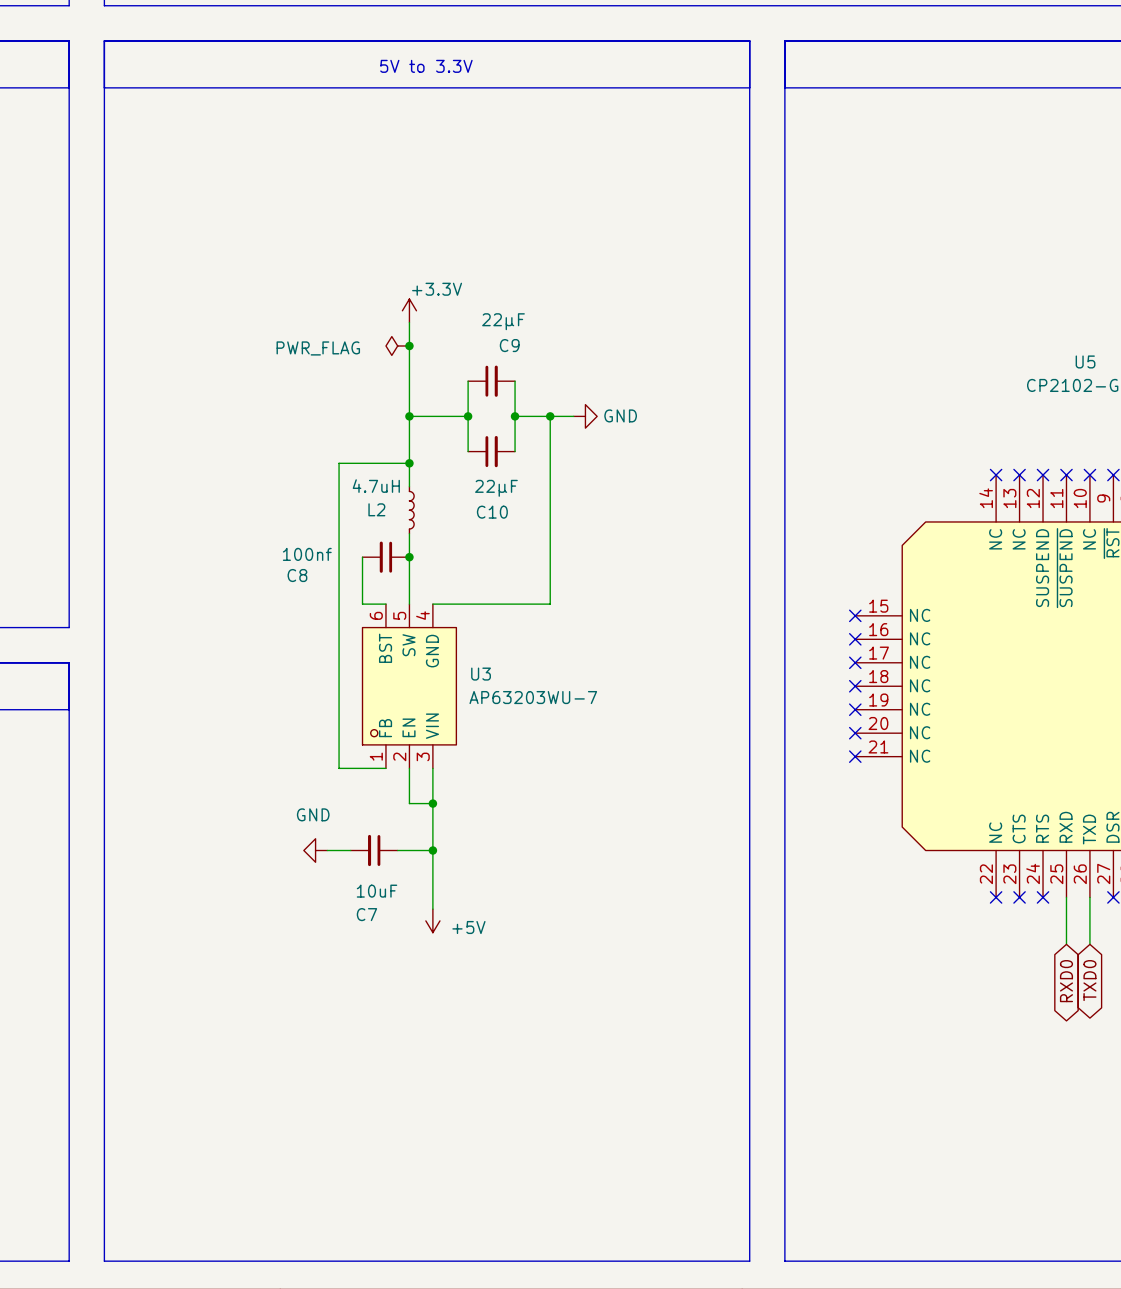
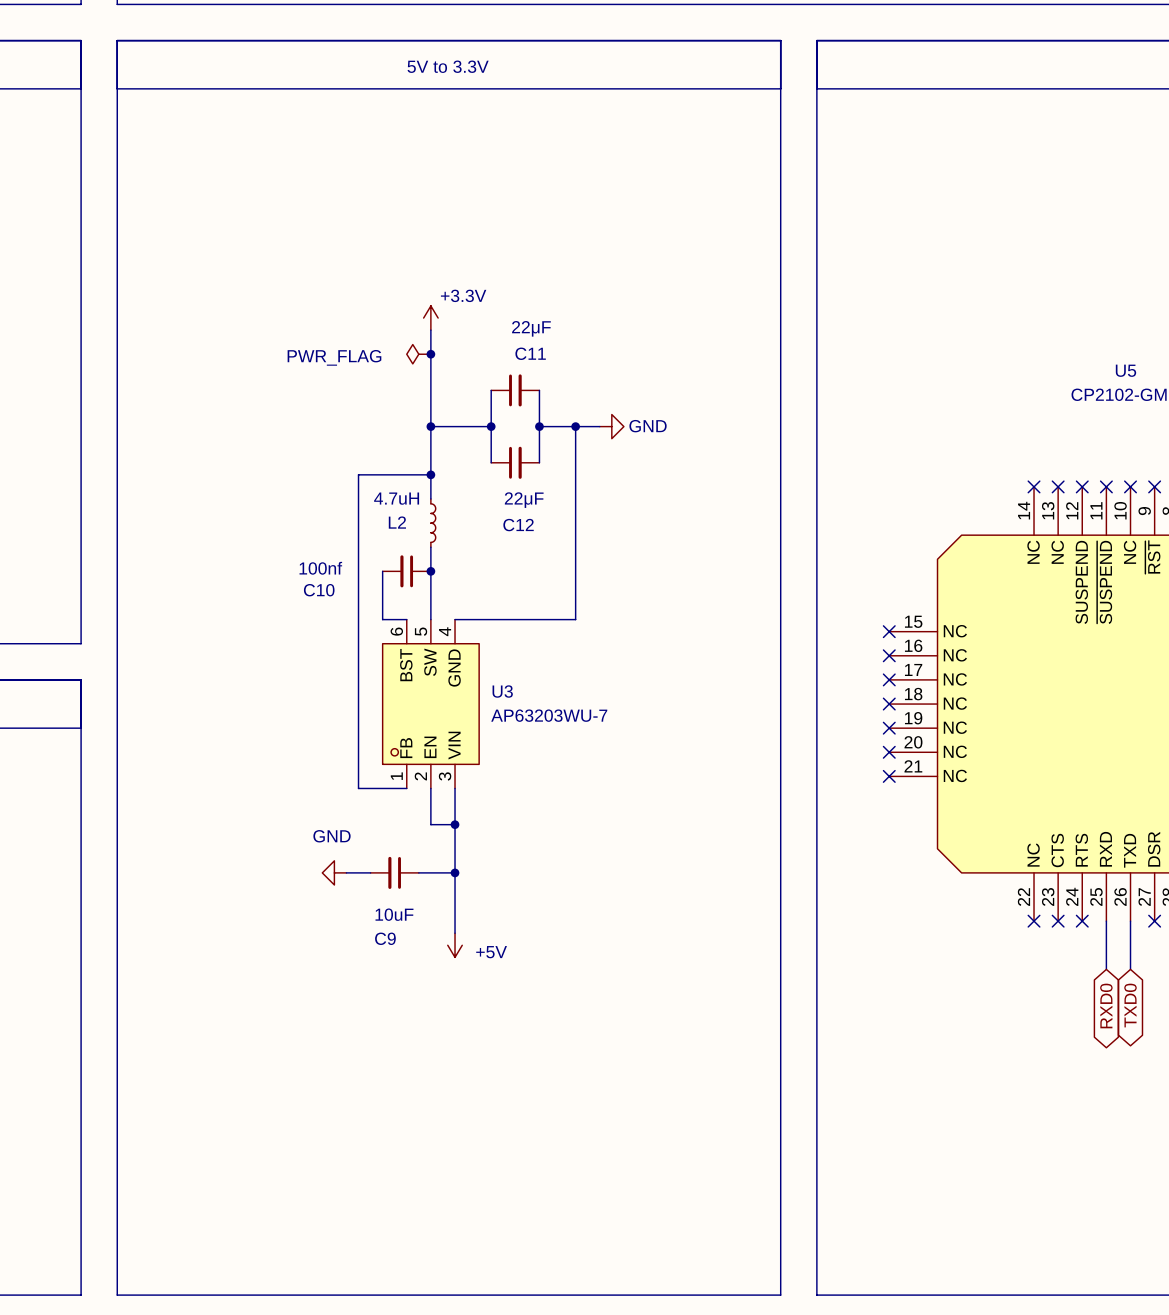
C9 name: C9 (509, 345) -> C11 (530, 353)
C10 name: C10 (492, 512) -> C12 (518, 525)
C8 name: C8 (297, 575) -> C10 (319, 590)
C7 name: C7 (366, 914) -> C9 (385, 938)

